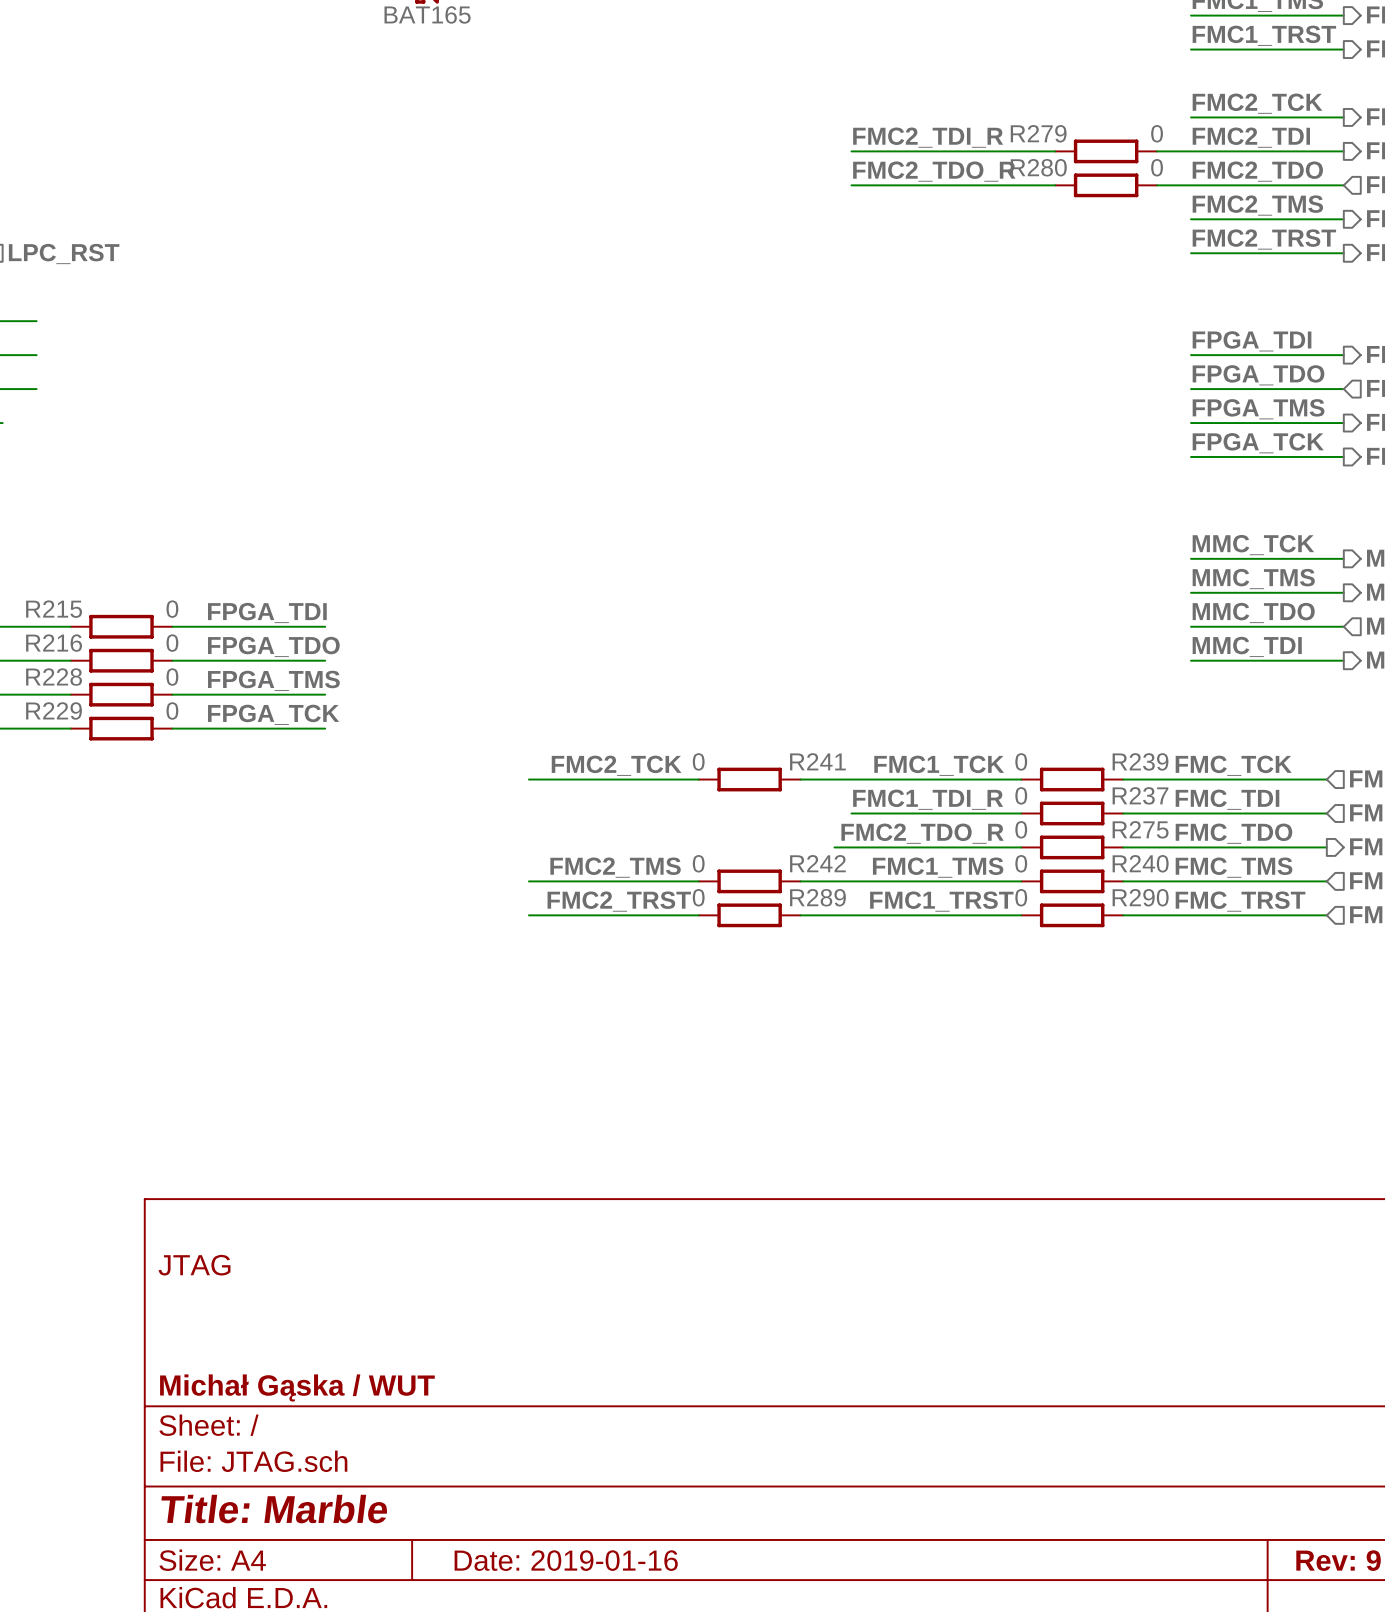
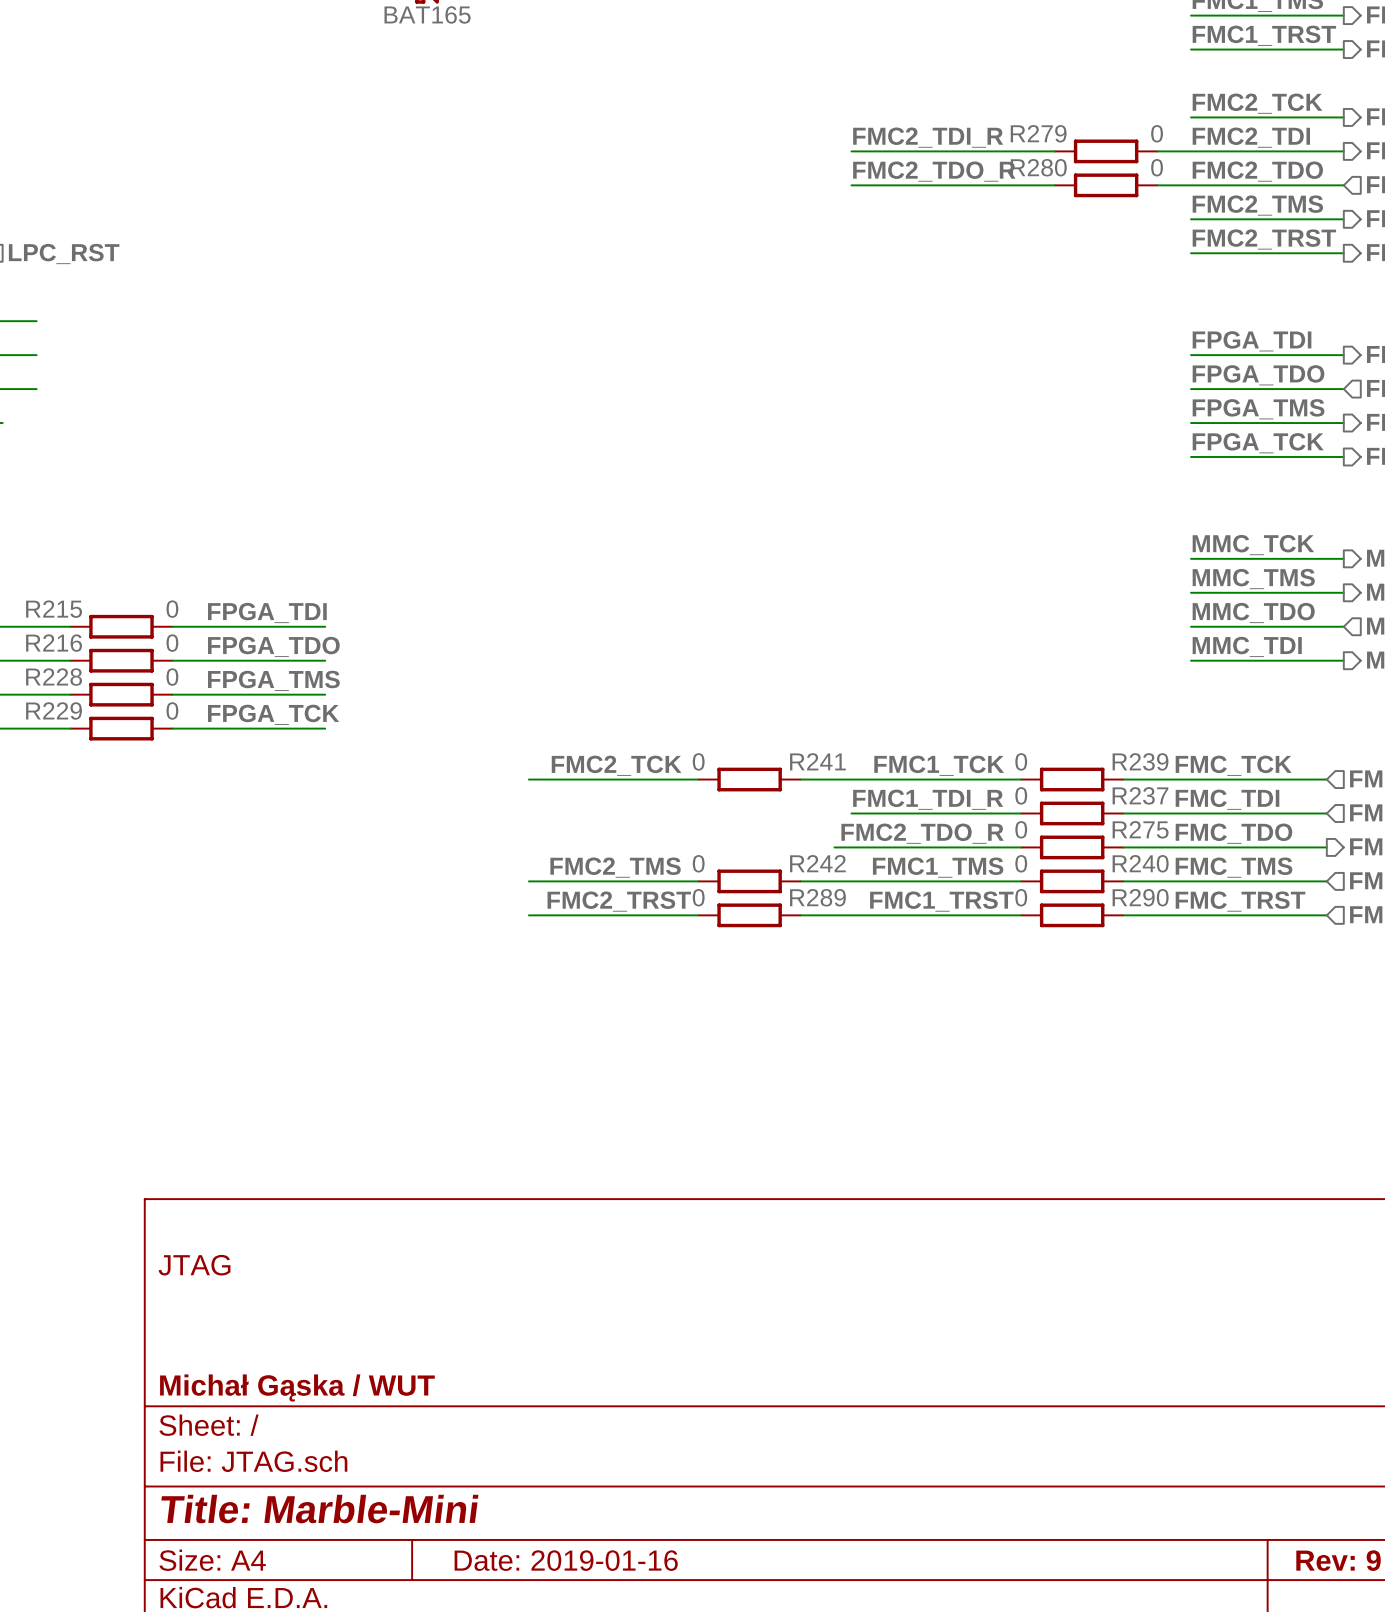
title block: Title: Marble (274, 1509) -> Title: Marble-Mini (319, 1509)

